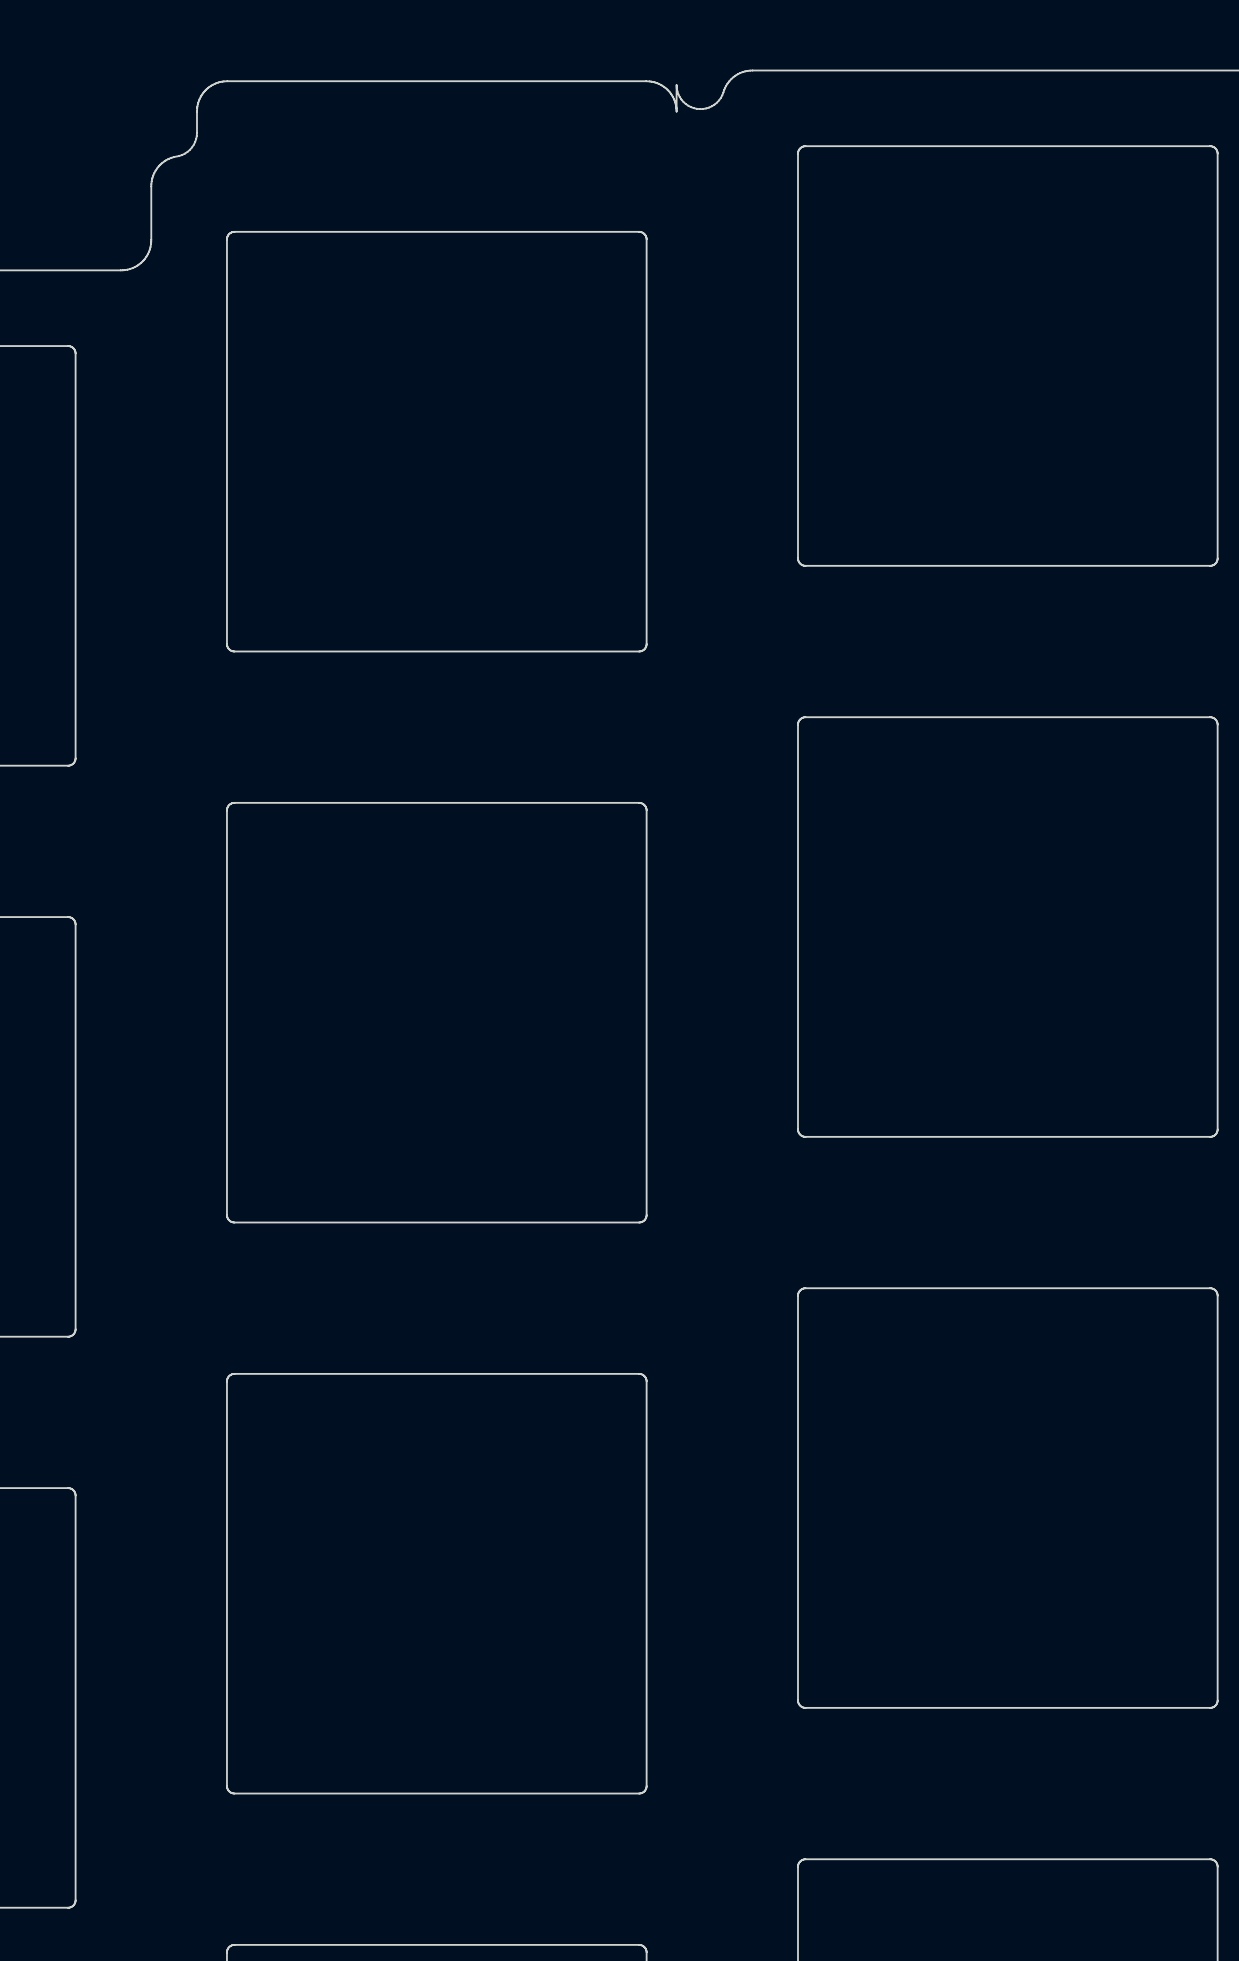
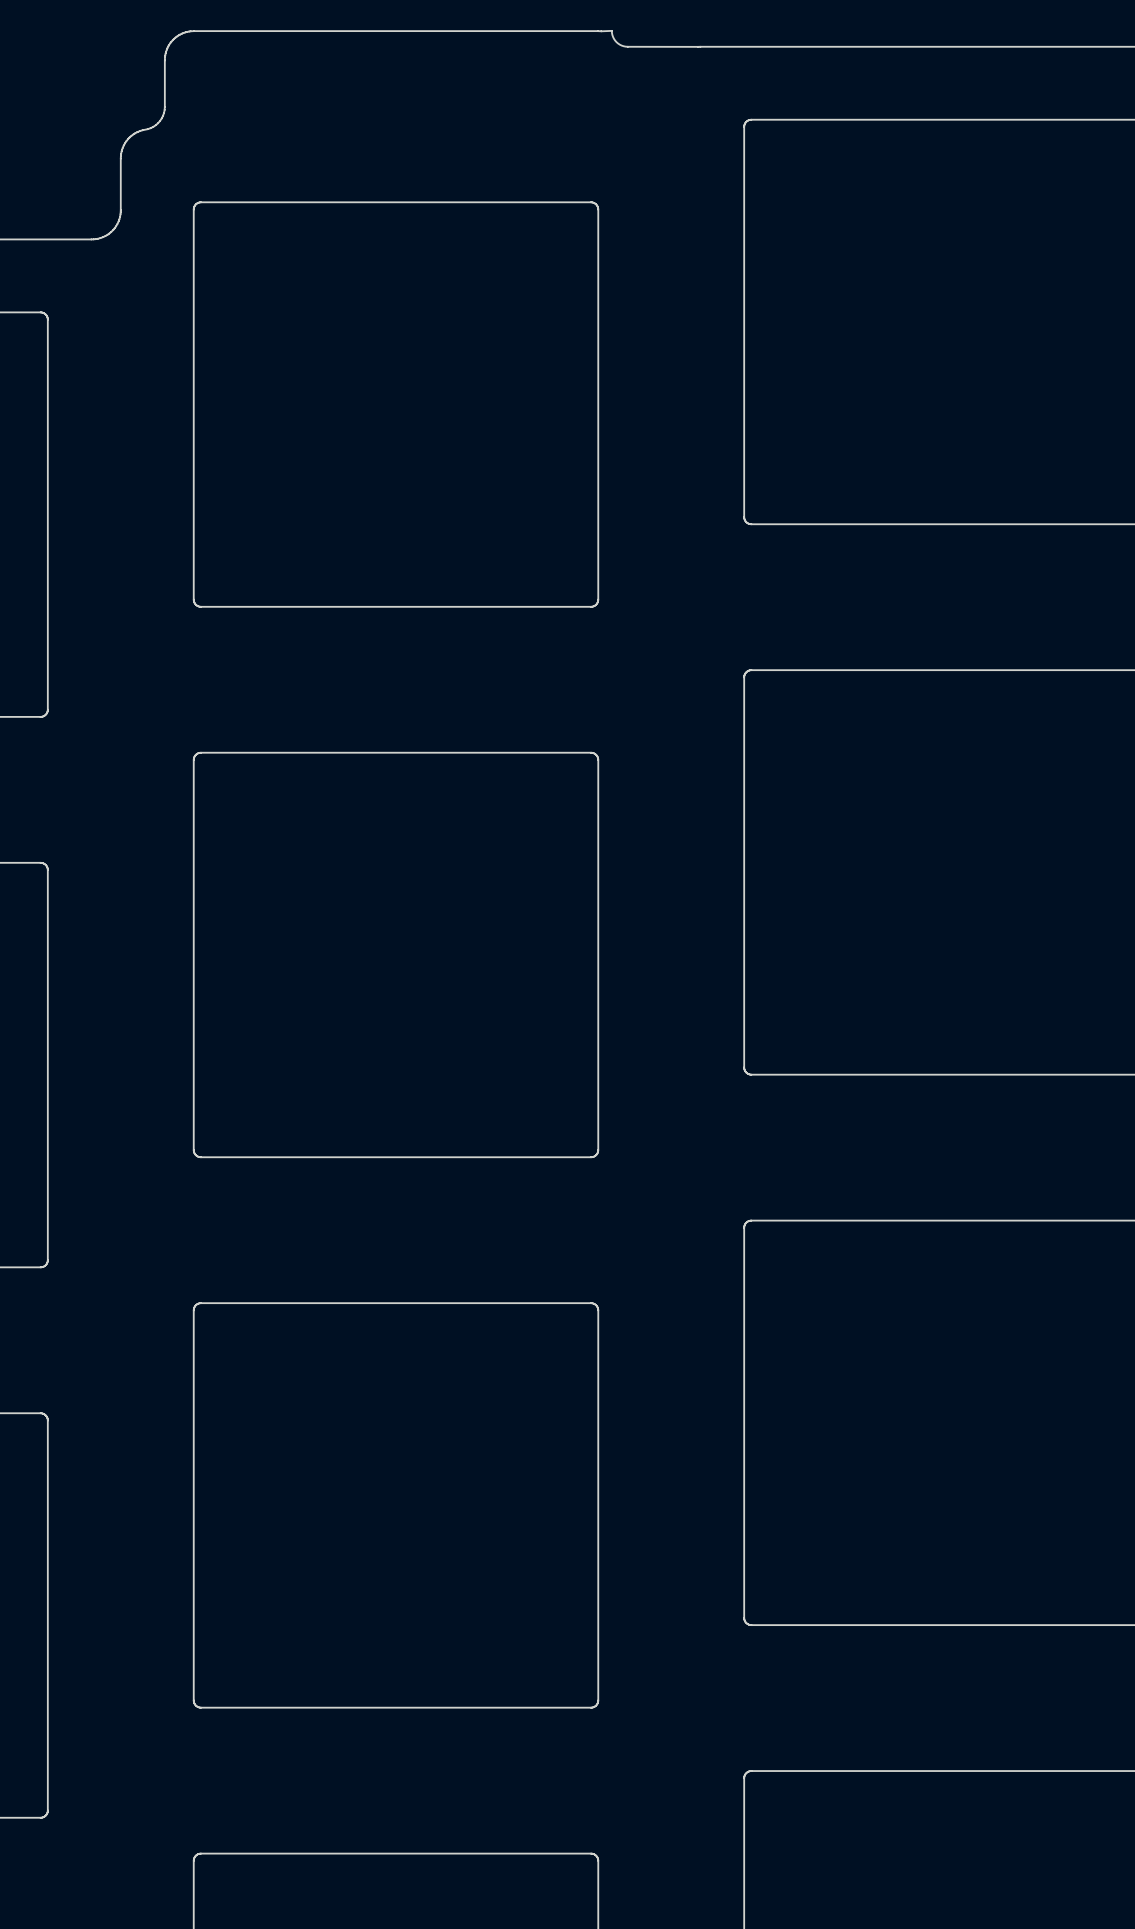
board edge: (750, 70) (733, 77) (727, 83) (719, 100) (706, 108) (696, 108) (685, 103) (679, 96) (676, 85) (676, 111) (674, 100) (668, 90) (658, 83) (646, 81) (223, 81) (212, 84) (205, 90) (199, 100) (196, 111) -> (698, 46) (625, 46) (616, 42) (611, 30) (190, 31) (176, 36) (167, 48) (165, 56) (164, 86)

